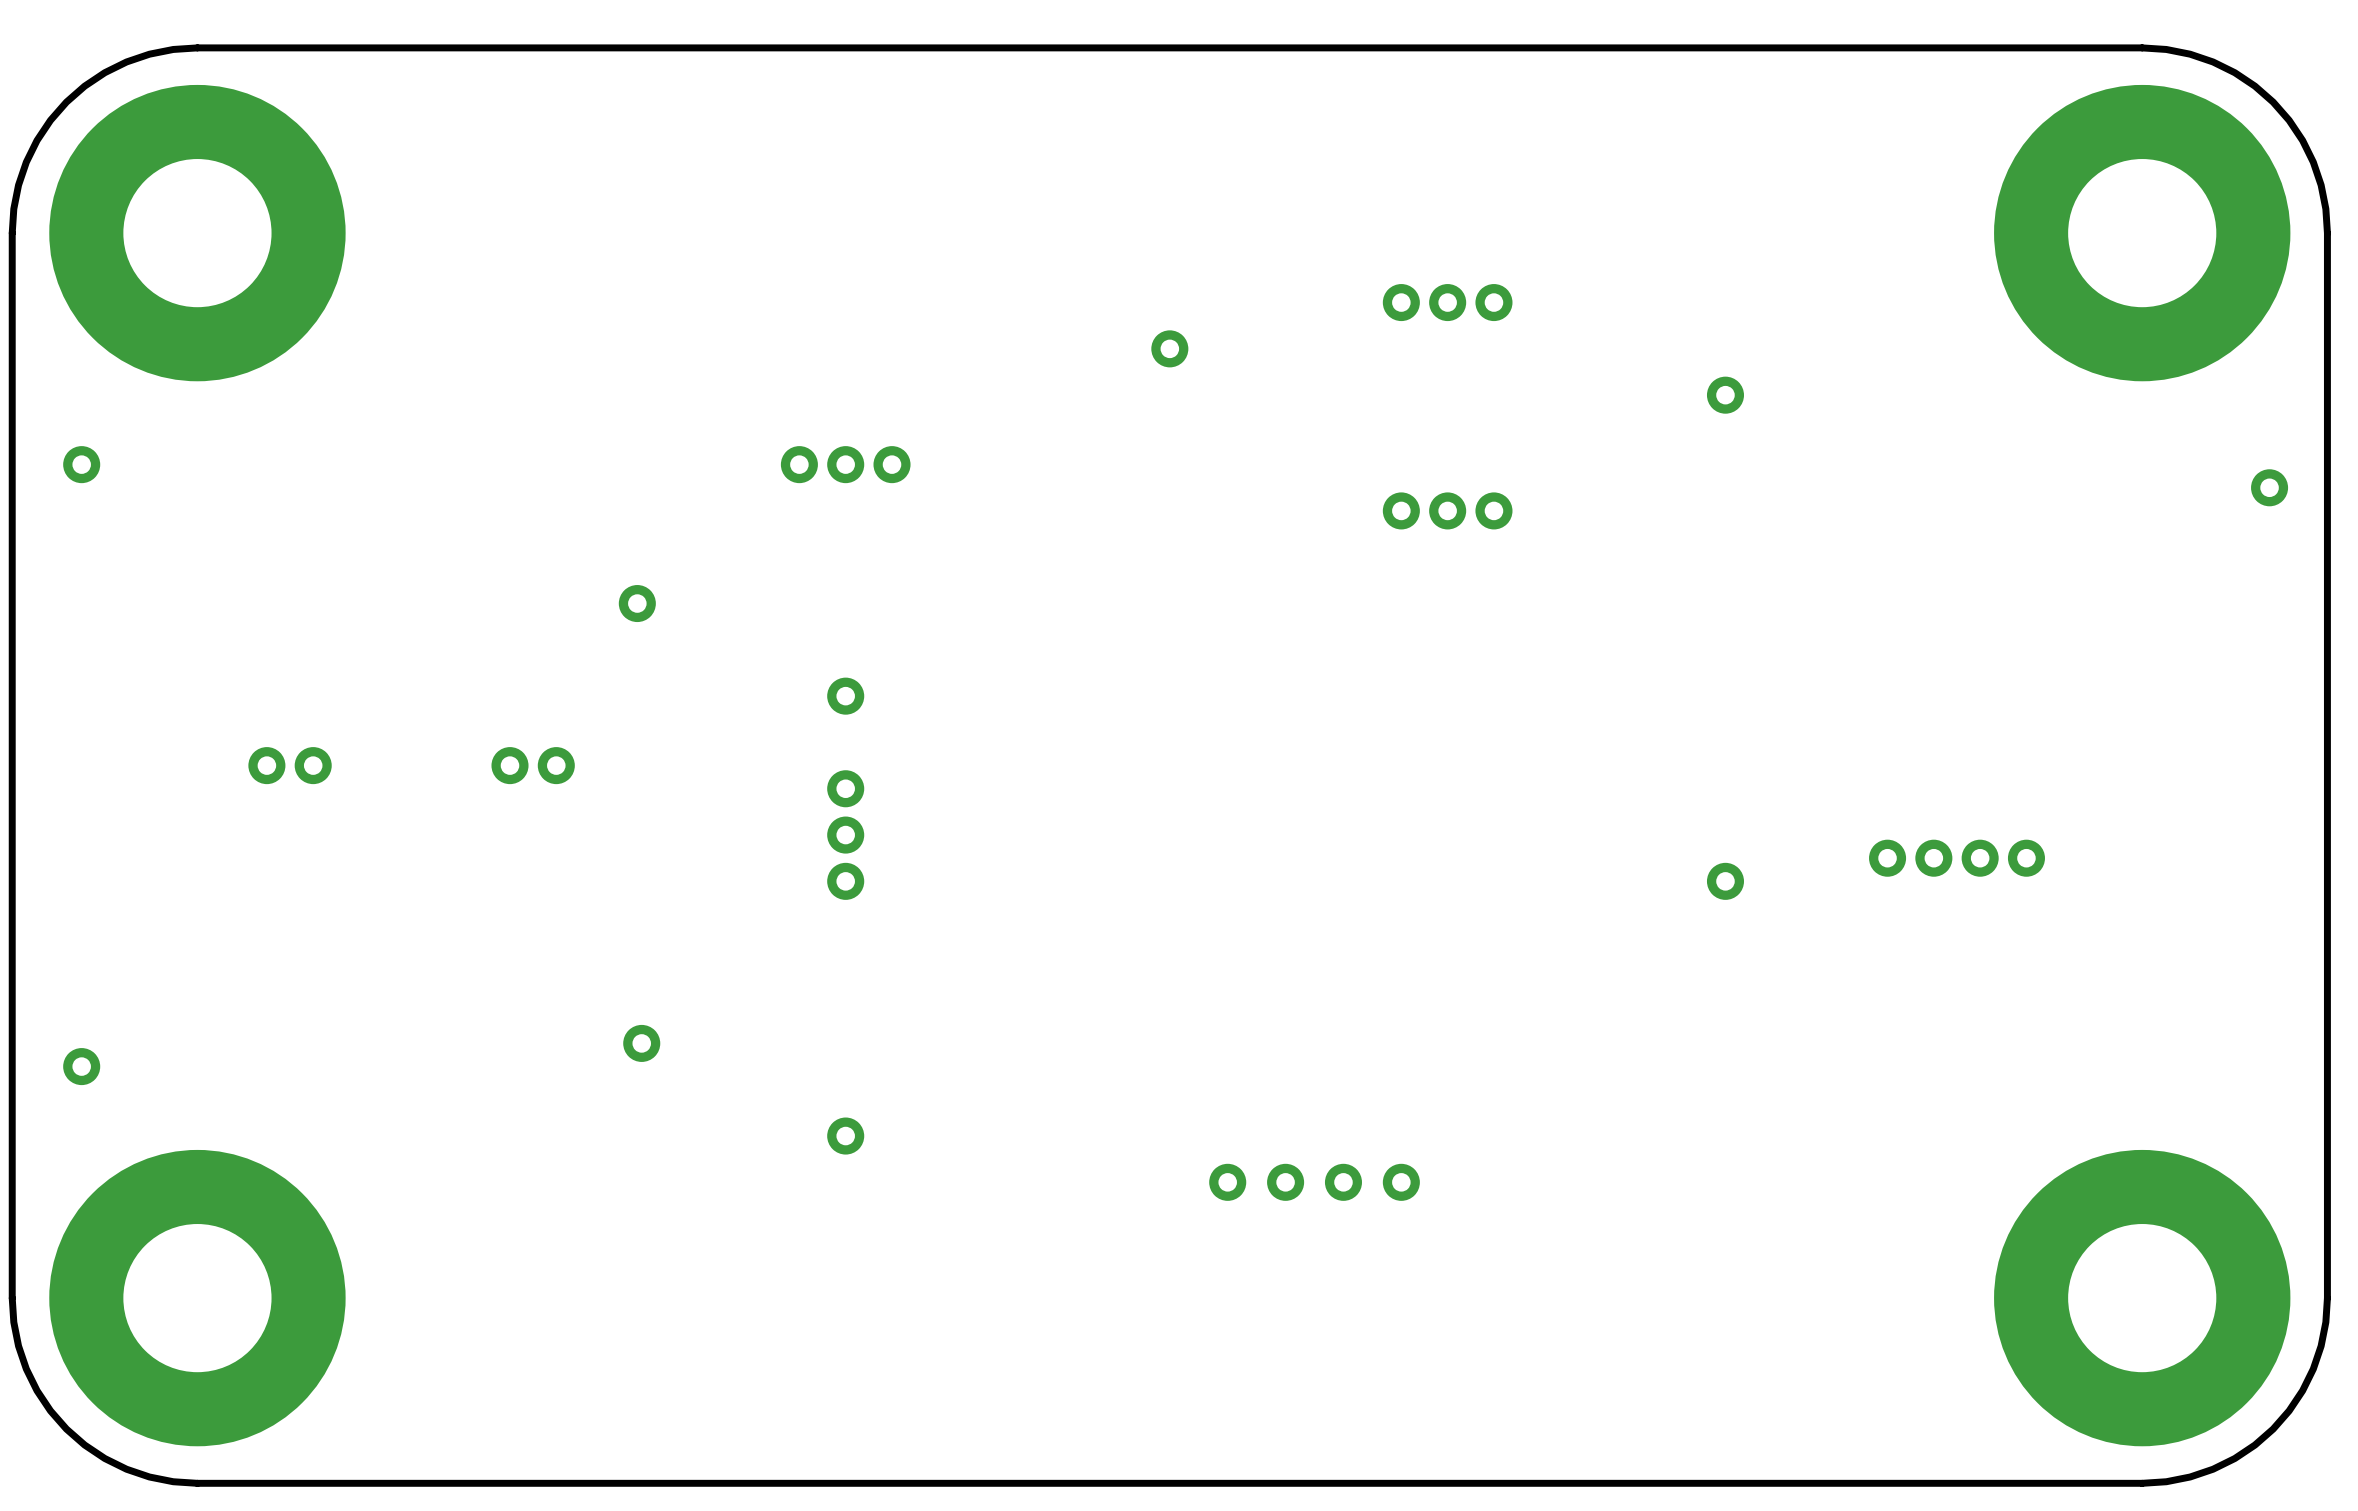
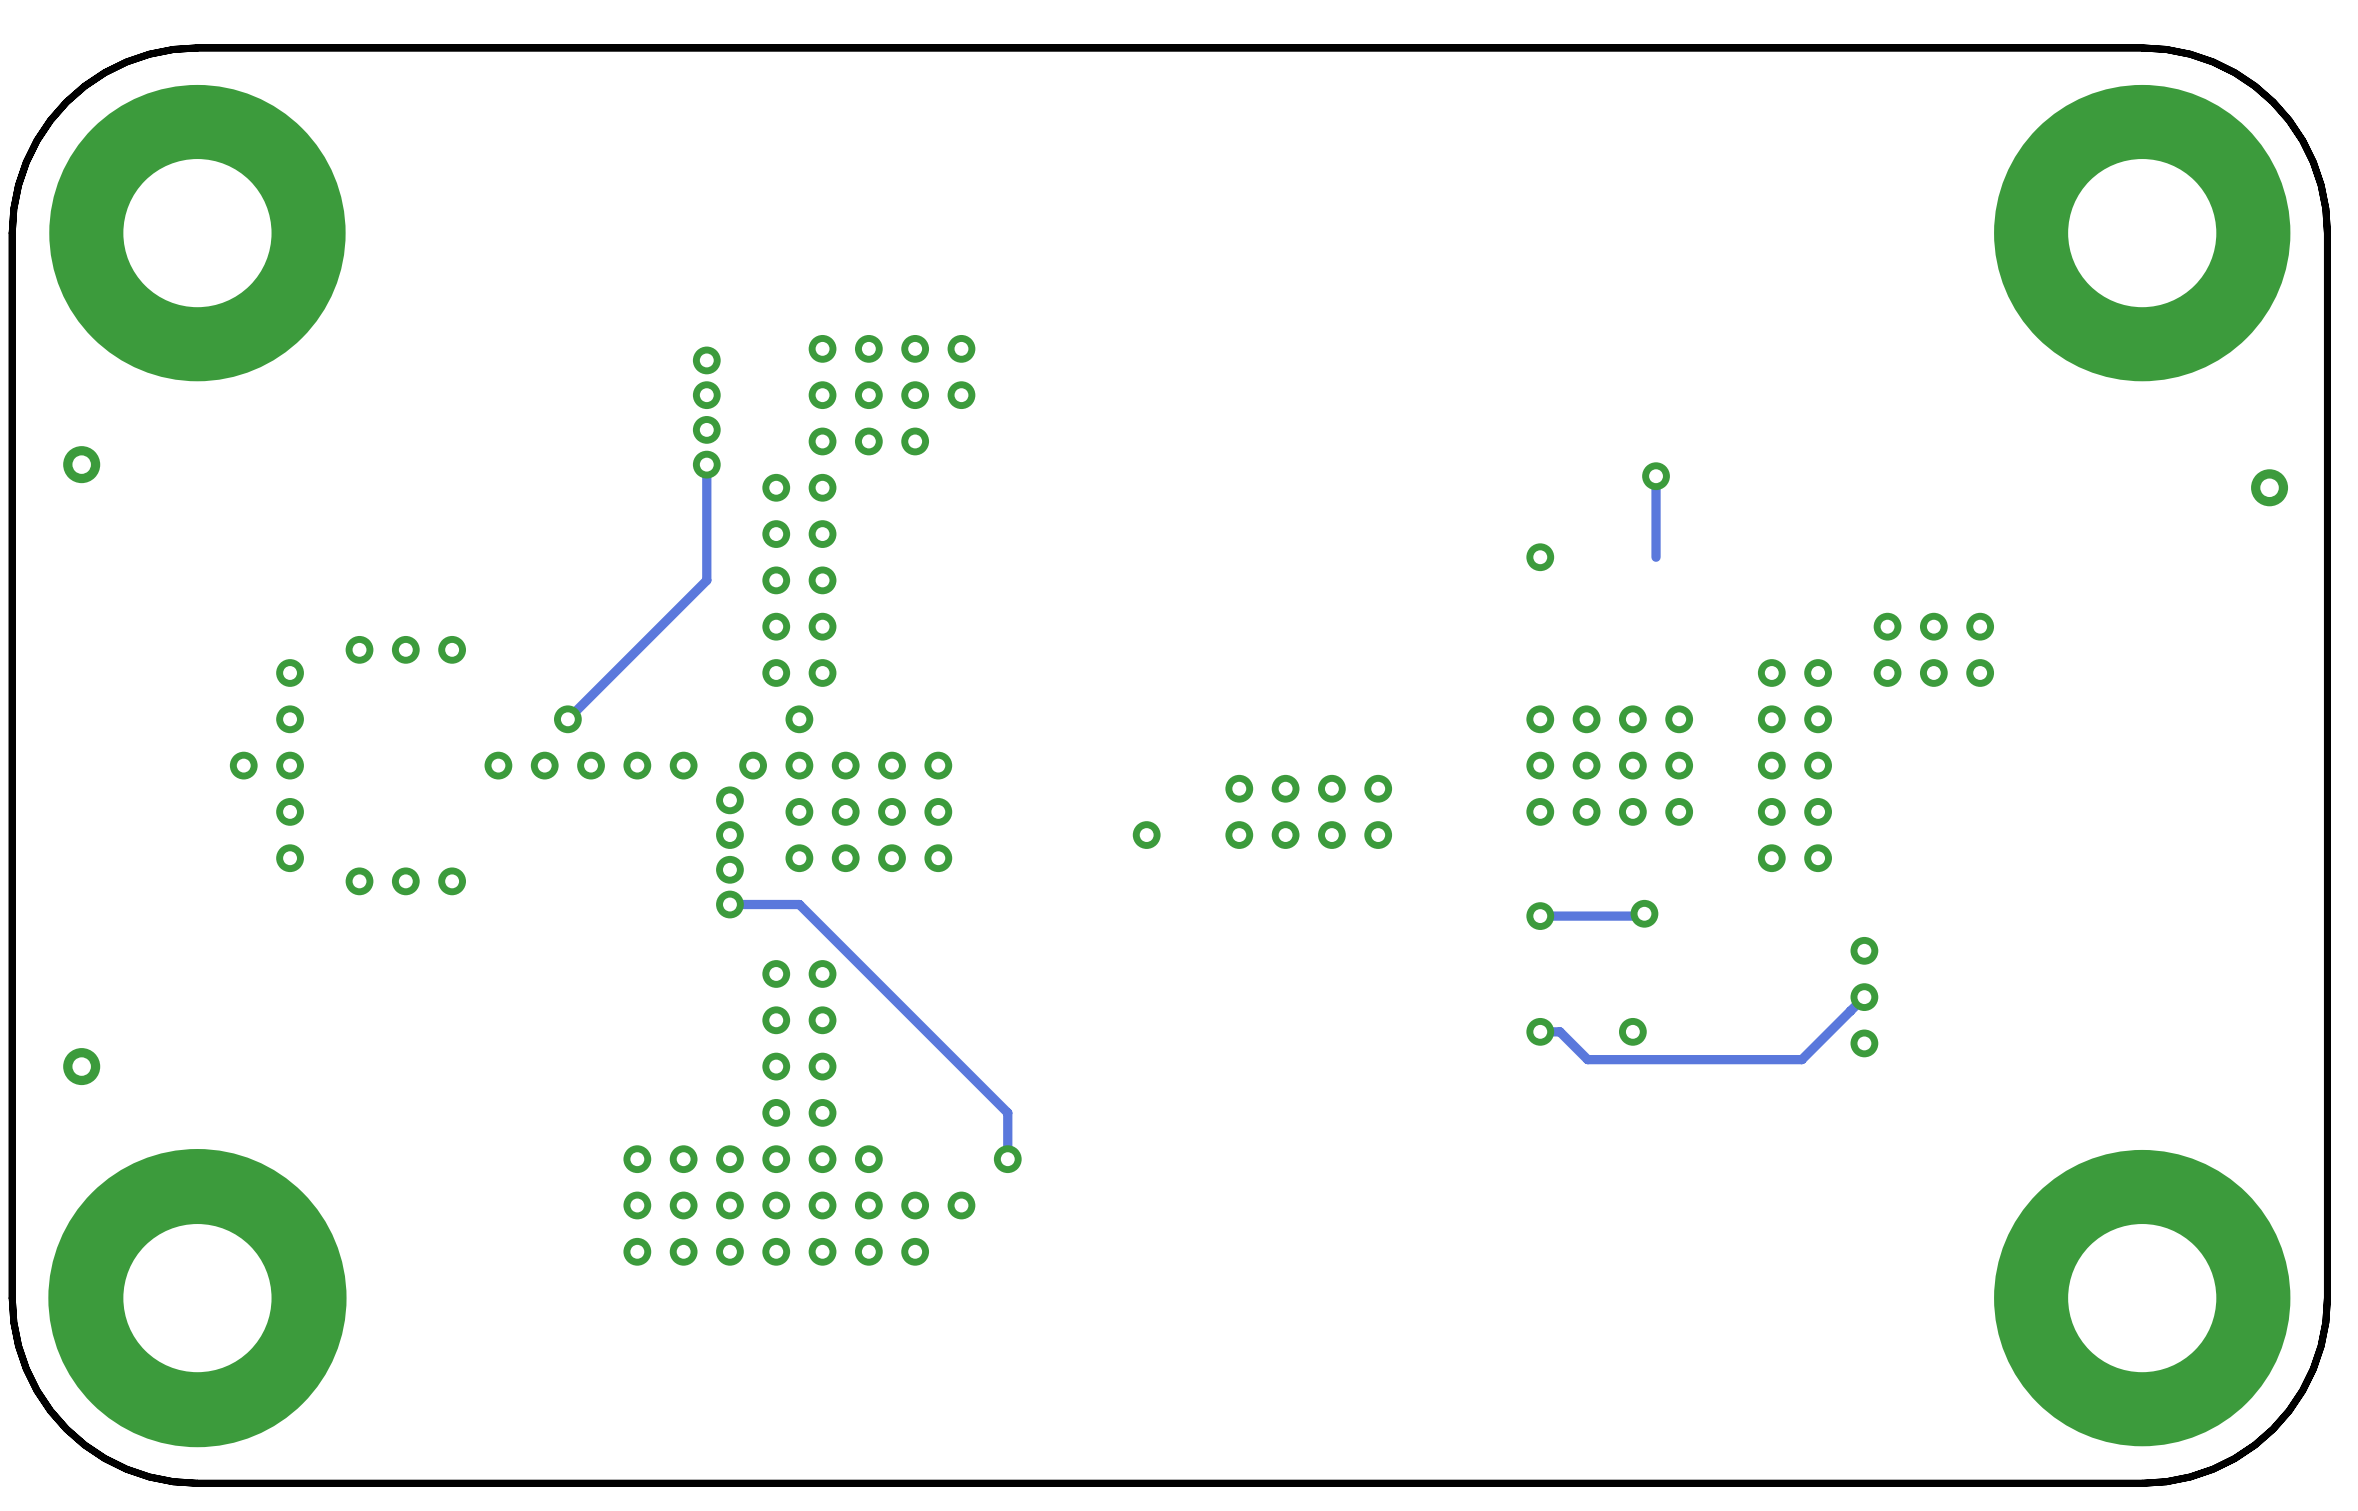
via: (1401, 302) -> none
via: (1447, 302) -> none
via: (1493, 302) -> none
via: none -> (822, 348)
via: none -> (868, 348)
via: none -> (915, 348)
via: none -> (961, 348)
via: (1169, 348) -> none
via: none -> (706, 360)
via: none -> (706, 395)
via: none -> (822, 395)
via: none -> (868, 395)
via: none -> (915, 395)
via: none -> (961, 395)
via: (1725, 395) -> none
via: none -> (706, 429)
via: none -> (822, 441)
via: none -> (868, 441)
via: none -> (915, 441)
track: none -> (706, 464) (706, 580) (567, 719)
via: none -> (706, 464)
via: (799, 464) -> none
via: (845, 464) -> none
via: (892, 464) -> none
track: none -> (1656, 476) (1656, 557)
via: none -> (1656, 476)
via: none -> (776, 487)
via: none -> (822, 487)
via: (1401, 510) -> none
via: (1447, 510) -> none
via: (1493, 510) -> none
via: none -> (776, 534)
via: none -> (822, 534)
via: none -> (1540, 557)
via: none -> (776, 580)
via: none -> (822, 580)
via: (637, 603) -> none
via: none -> (776, 626)
via: none -> (822, 626)
via: none -> (1887, 626)
via: none -> (1933, 626)
via: none -> (1980, 626)
via: none -> (359, 649)
via: none -> (405, 649)
via: none -> (452, 649)
via: none -> (290, 672)
via: none -> (776, 672)
via: none -> (1771, 672)
via: none -> (1818, 672)
via: none -> (1887, 672)
via: none -> (1933, 672)
via: none -> (1980, 672)
via position: (845, 696) -> (822, 672)
via: none -> (290, 719)
via: none -> (567, 719)
via: none -> (799, 719)
via: none -> (1540, 719)
via: none -> (1586, 719)
via: none -> (1632, 719)
via: none -> (1679, 719)
via: none -> (1771, 719)
via: none -> (1818, 719)
via size: [491, 747, 529, 785] -> [484, 751, 513, 780]
via size: [537, 747, 575, 785] -> [530, 751, 559, 780]
via: none -> (243, 765)
via: (266, 765) -> none
via: none -> (290, 765)
via: (313, 765) -> none
via: none -> (591, 765)
via: none -> (637, 765)
via: none -> (683, 765)
via: none -> (753, 765)
via: none -> (799, 765)
via: none -> (845, 765)
via: none -> (892, 765)
via: none -> (938, 765)
part: none -> (1169, 765)
via: none -> (1540, 765)
via: none -> (1586, 765)
via: none -> (1632, 765)
via: none -> (1679, 765)
via: none -> (1771, 765)
via: none -> (1818, 765)
via: (845, 788) -> none
via: none -> (1239, 788)
via: none -> (1285, 788)
via: none -> (1331, 788)
via: none -> (1378, 788)
via: none -> (729, 800)
via: none -> (290, 811)
via: none -> (799, 811)
via: none -> (845, 811)
via: none -> (892, 811)
via: none -> (938, 811)
via: none -> (1540, 811)
via: none -> (1586, 811)
via: none -> (1632, 811)
via: none -> (1679, 811)
via: none -> (1771, 811)
via: none -> (1818, 811)
via: none -> (729, 835)
via: (845, 835) -> none
via: none -> (1146, 835)
via: none -> (1239, 835)
via: none -> (1285, 835)
via: none -> (1331, 835)
via: none -> (1378, 835)
via: none -> (290, 858)
via: none -> (799, 858)
via: none -> (845, 858)
via: none -> (892, 858)
via: none -> (938, 858)
via: none -> (1771, 858)
via: none -> (1818, 858)
via: (1887, 858) -> none
via: (1933, 858) -> none
via: (1980, 858) -> none
via: (2026, 858) -> none
via: none -> (729, 869)
via: none -> (359, 881)
via: none -> (405, 881)
via: none -> (452, 881)
via: (845, 881) -> none
via: (1725, 881) -> none
track: none -> (729, 904) (799, 904) (1007, 1112) (1007, 1159)
via: none -> (729, 904)
via: none -> (1644, 913)
via: none -> (1540, 916)
track: none -> (1644, 916) (1540, 916)
via: none -> (1864, 950)
via: none -> (776, 973)
via: none -> (822, 973)
track: none -> (1864, 997) (1801, 1059) (1587, 1059) (1559, 1031) (1540, 1031)
via: none -> (1864, 997)
via: none -> (776, 1020)
via: none -> (822, 1020)
via: none -> (1540, 1031)
via: none -> (1632, 1031)
via: (641, 1043) -> none
via: none -> (1864, 1043)
via: none -> (776, 1066)
via: none -> (822, 1066)
via: none -> (776, 1112)
via: none -> (822, 1112)
via: (845, 1136) -> none
via: none -> (637, 1159)
via: none -> (683, 1159)
via: none -> (729, 1159)
via: none -> (776, 1159)
via: none -> (822, 1159)
via: none -> (868, 1159)
via: none -> (1007, 1159)
via: (1227, 1182) -> none
via: (1285, 1182) -> none
via: (1343, 1182) -> none
via: (1401, 1182) -> none
via: none -> (637, 1205)
via: none -> (683, 1205)
via: none -> (729, 1205)
via: none -> (776, 1205)
via: none -> (822, 1205)
via: none -> (868, 1205)
via: none -> (915, 1205)
via: none -> (961, 1205)
via: none -> (637, 1251)
via: none -> (683, 1251)
via: none -> (729, 1251)
via: none -> (776, 1251)
via: none -> (822, 1251)
via: none -> (868, 1251)
via: none -> (915, 1251)
part: (197, 1298) -> none

